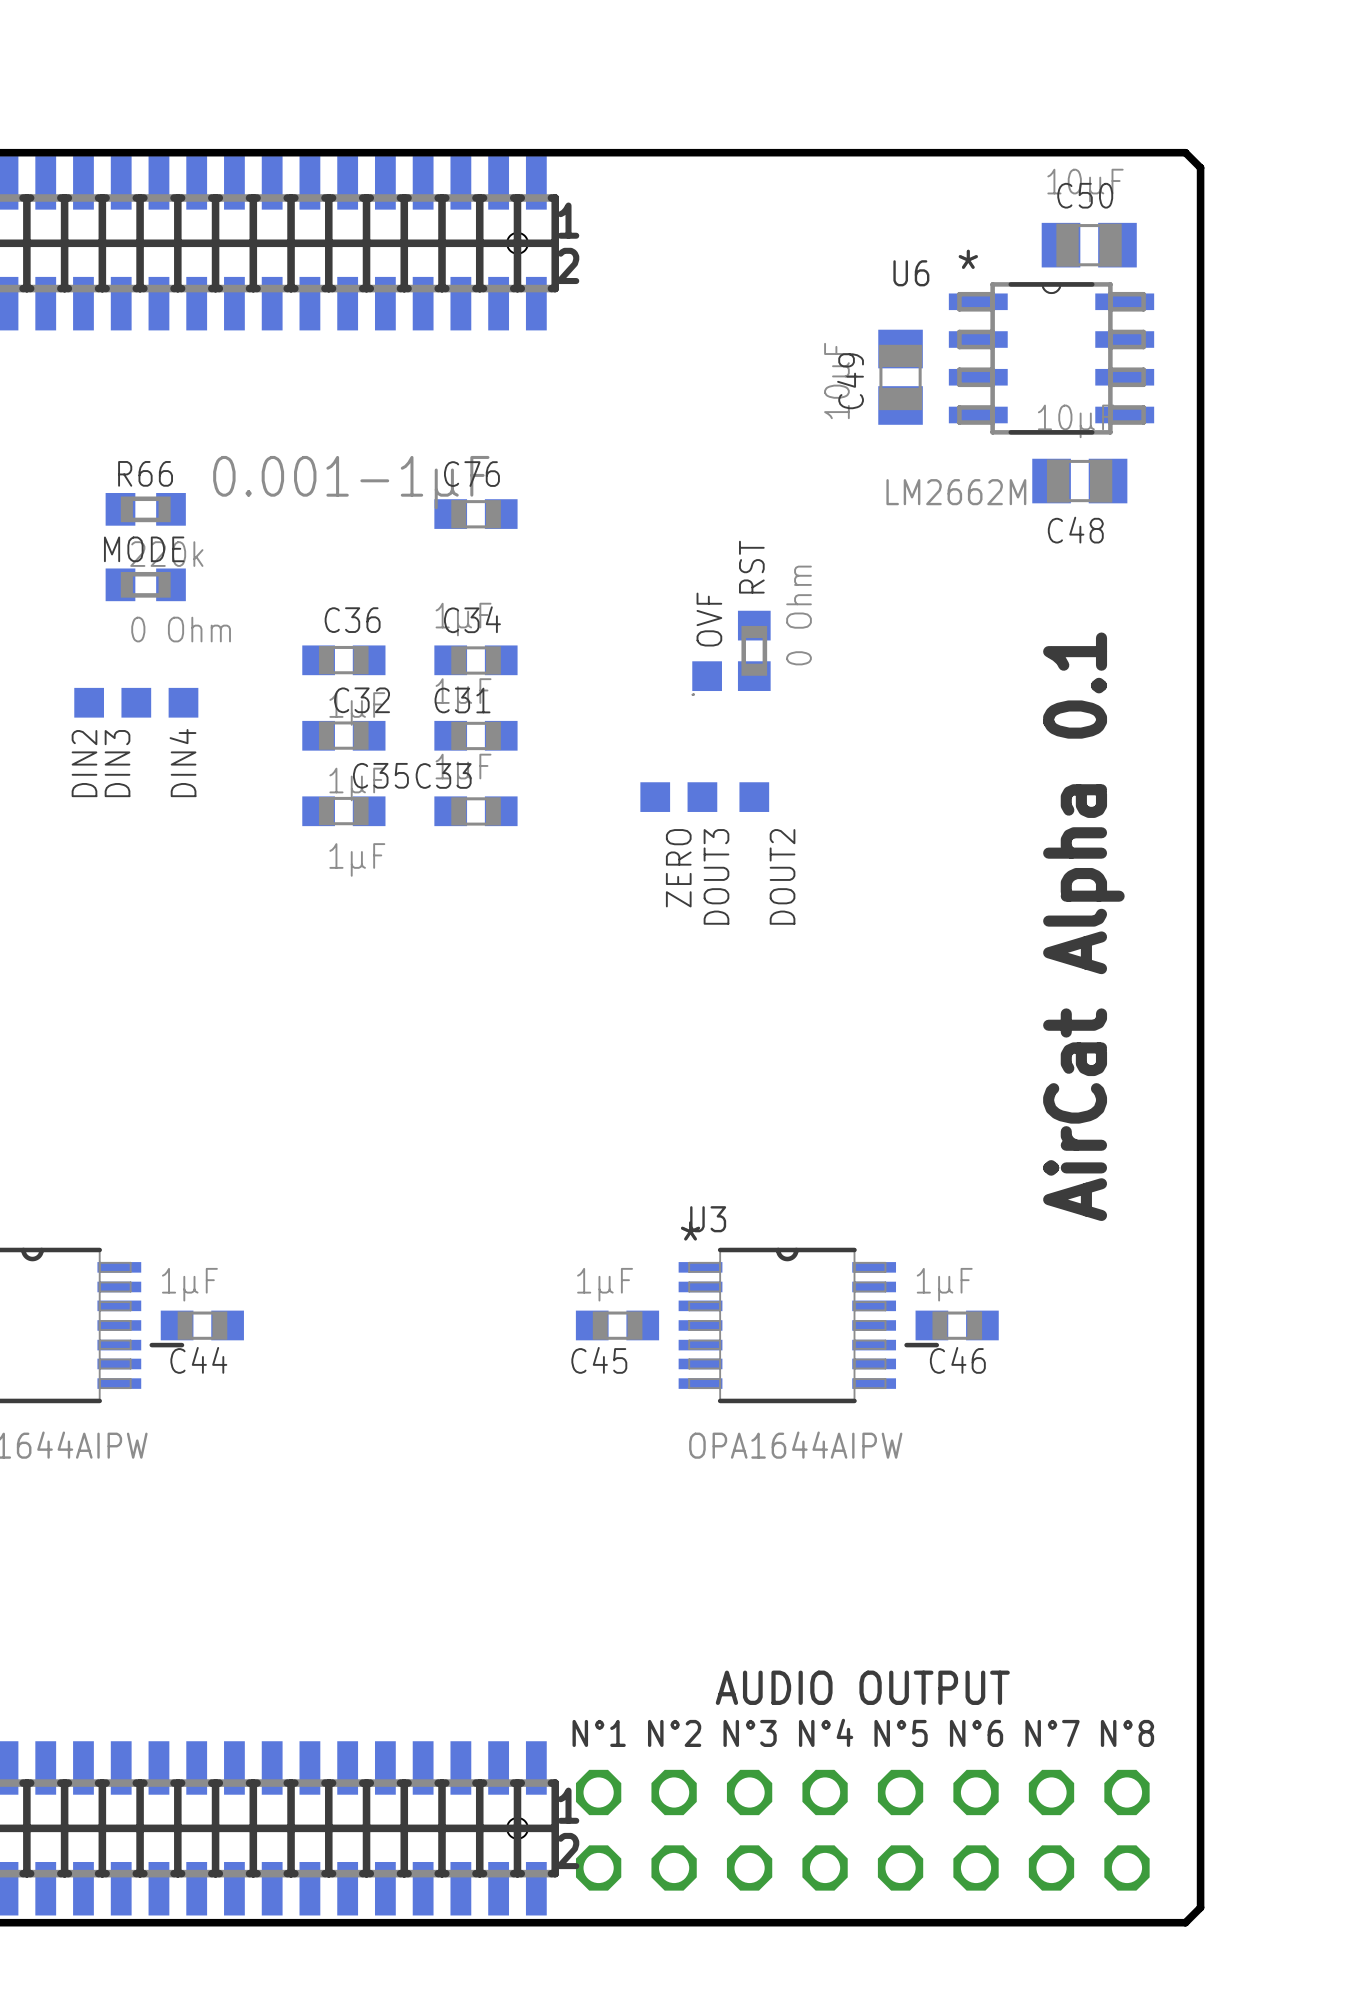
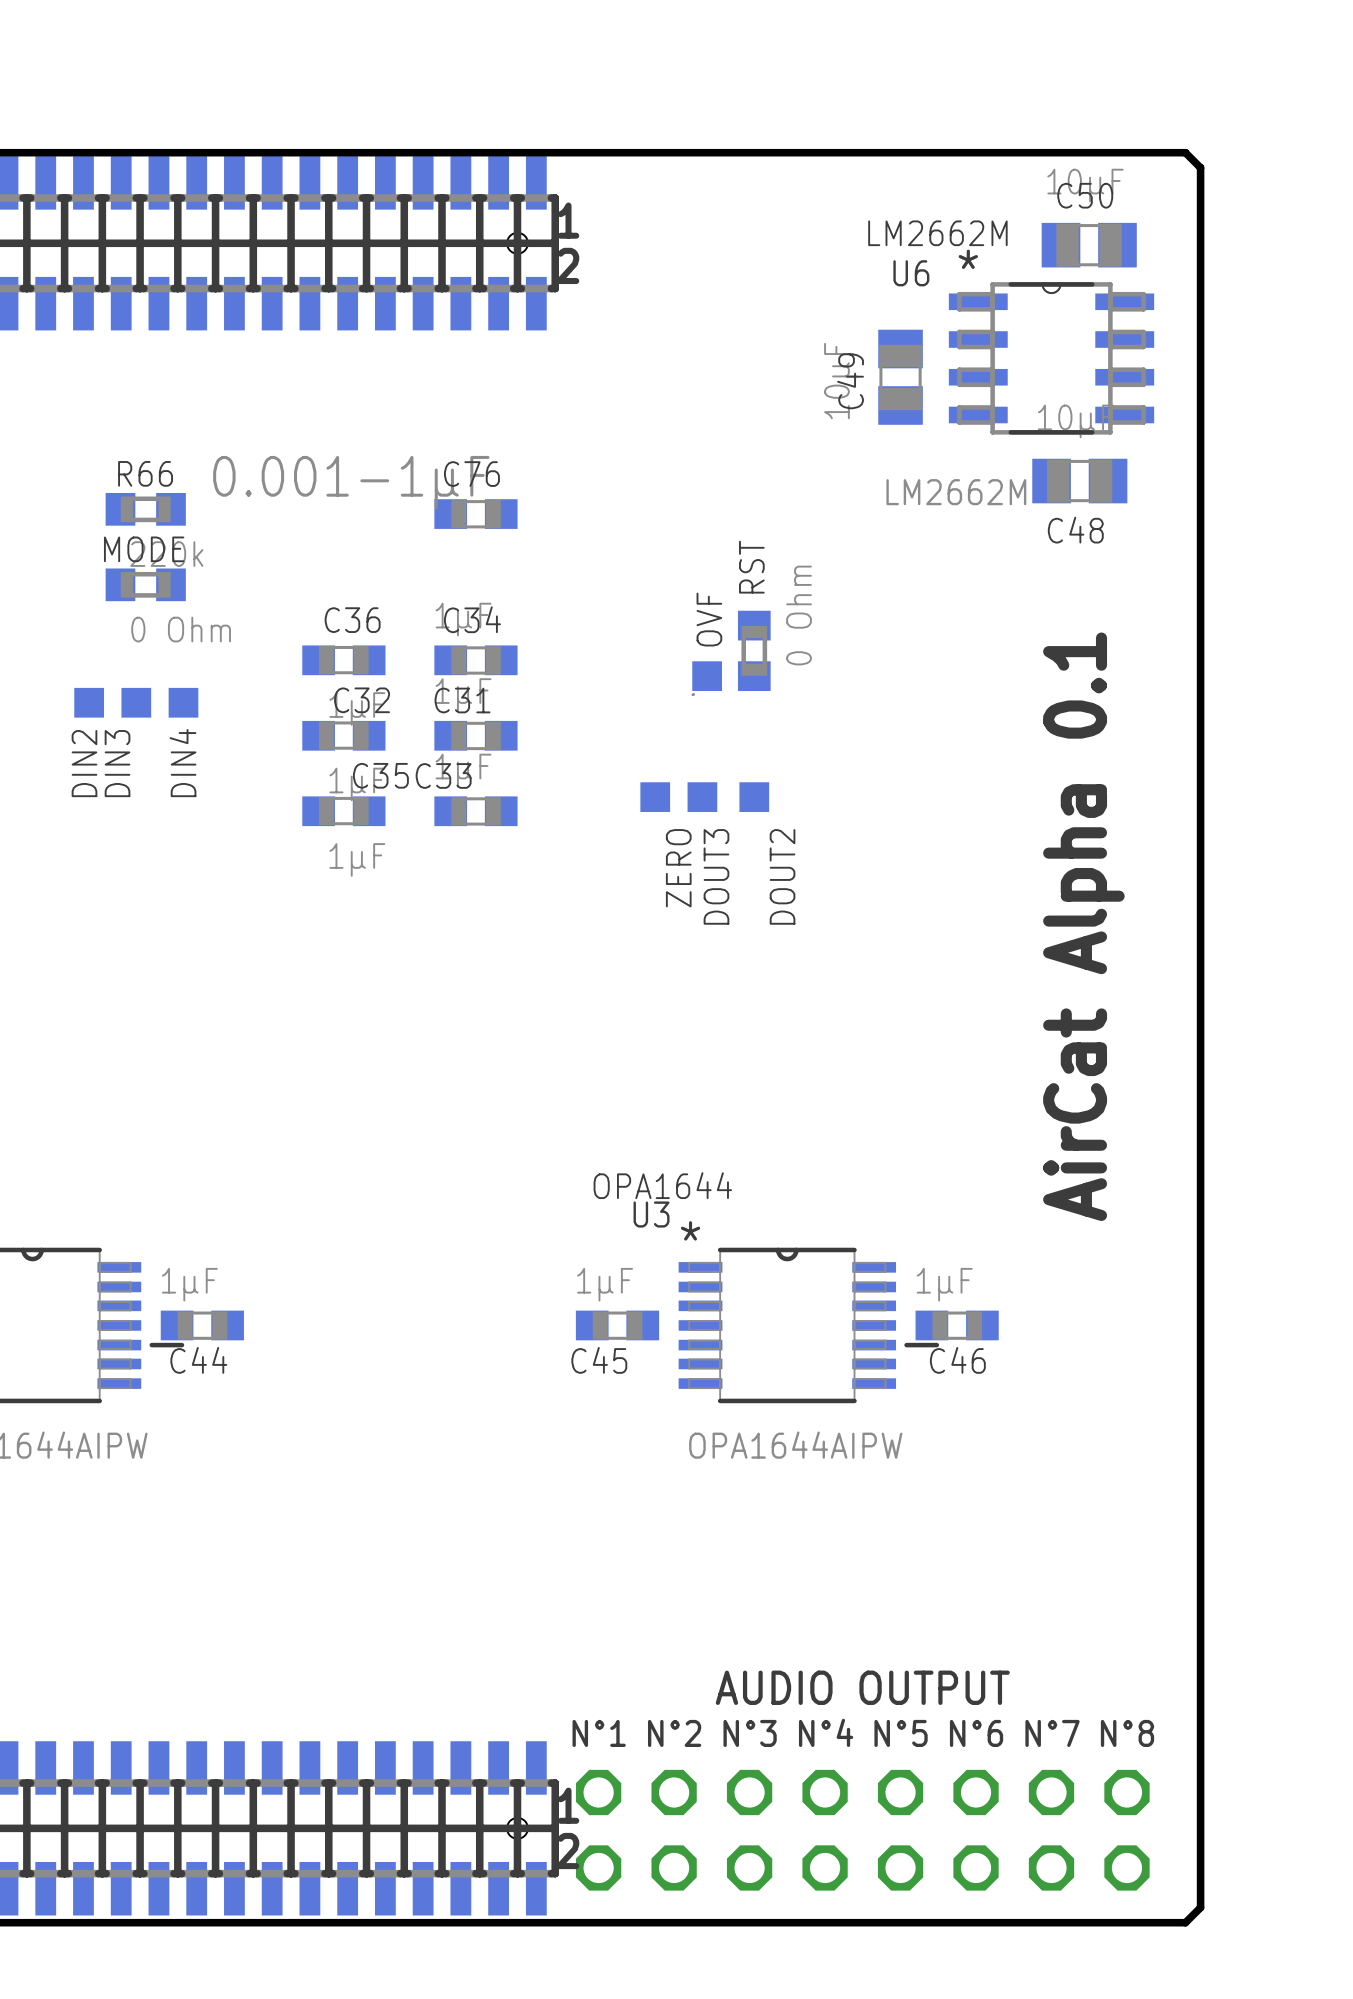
text: none -> LM2662M (937, 233)
text: none -> OPA1644 (662, 1185)
U3 name position: U3 (708, 1219) -> U3 (651, 1214)

